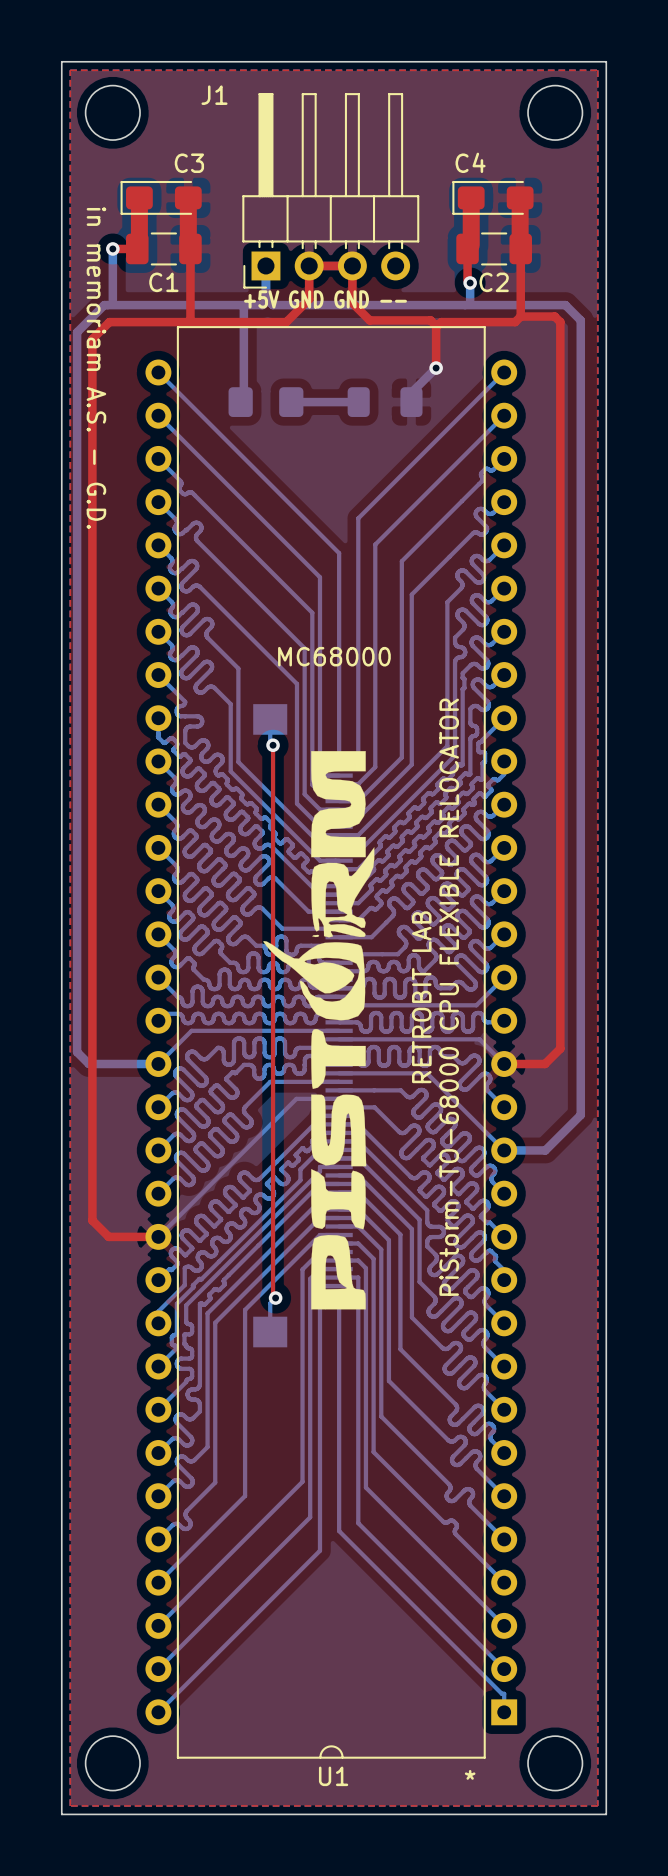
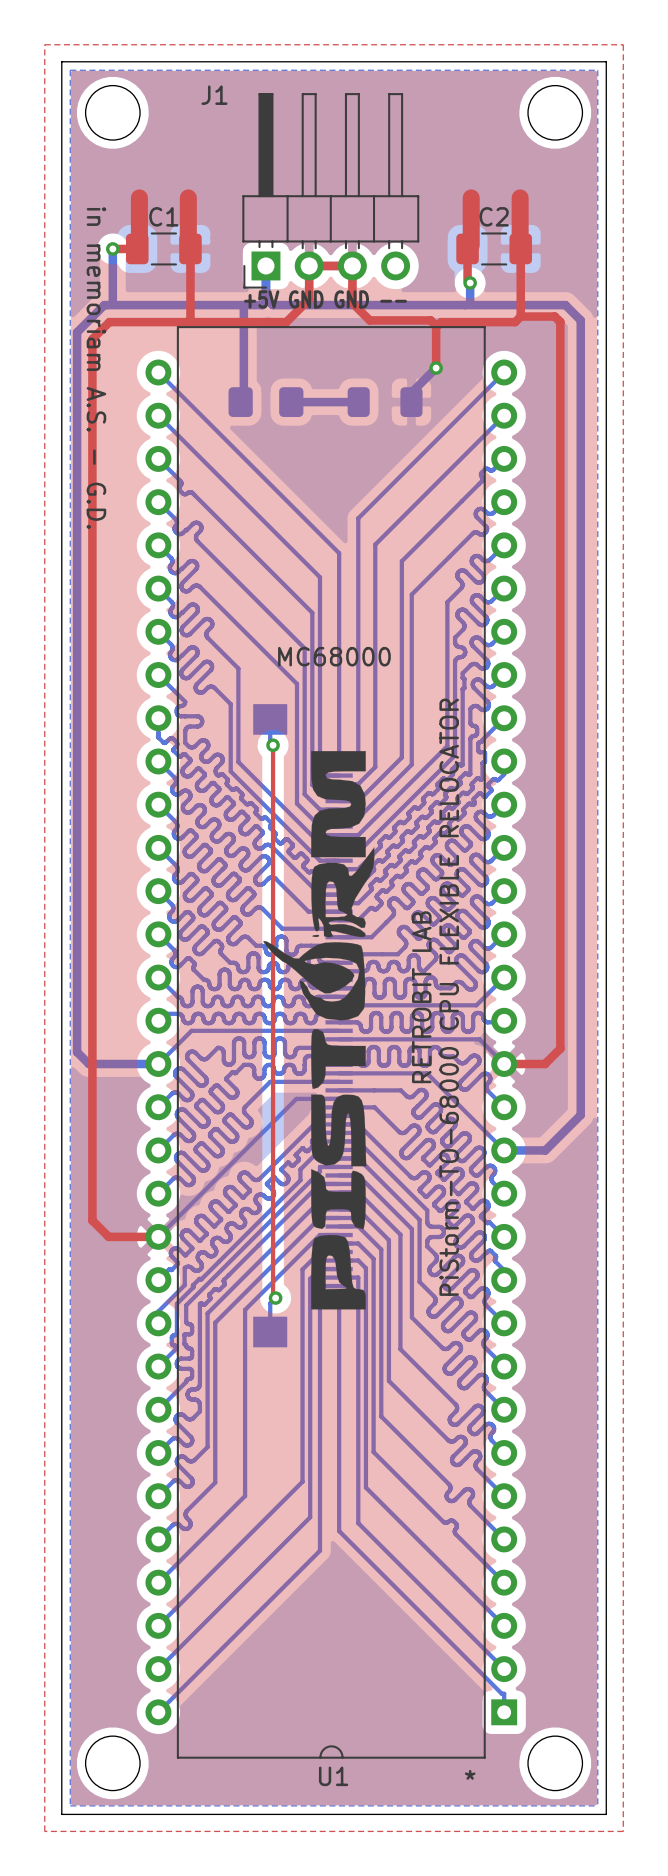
top zone outline: (70, 70) (70, 1805) (597, 1805) (597, 70) (70, 70) -> (44, 44) (44, 1831) (623, 1831) (623, 44) (44, 44)
C3: (161, 197) -> none
C4: (492, 197) -> none
C1 name position: C1 (163, 282) -> C1 (163, 216)
C2 name position: C2 (494, 282) -> C2 (494, 216)

